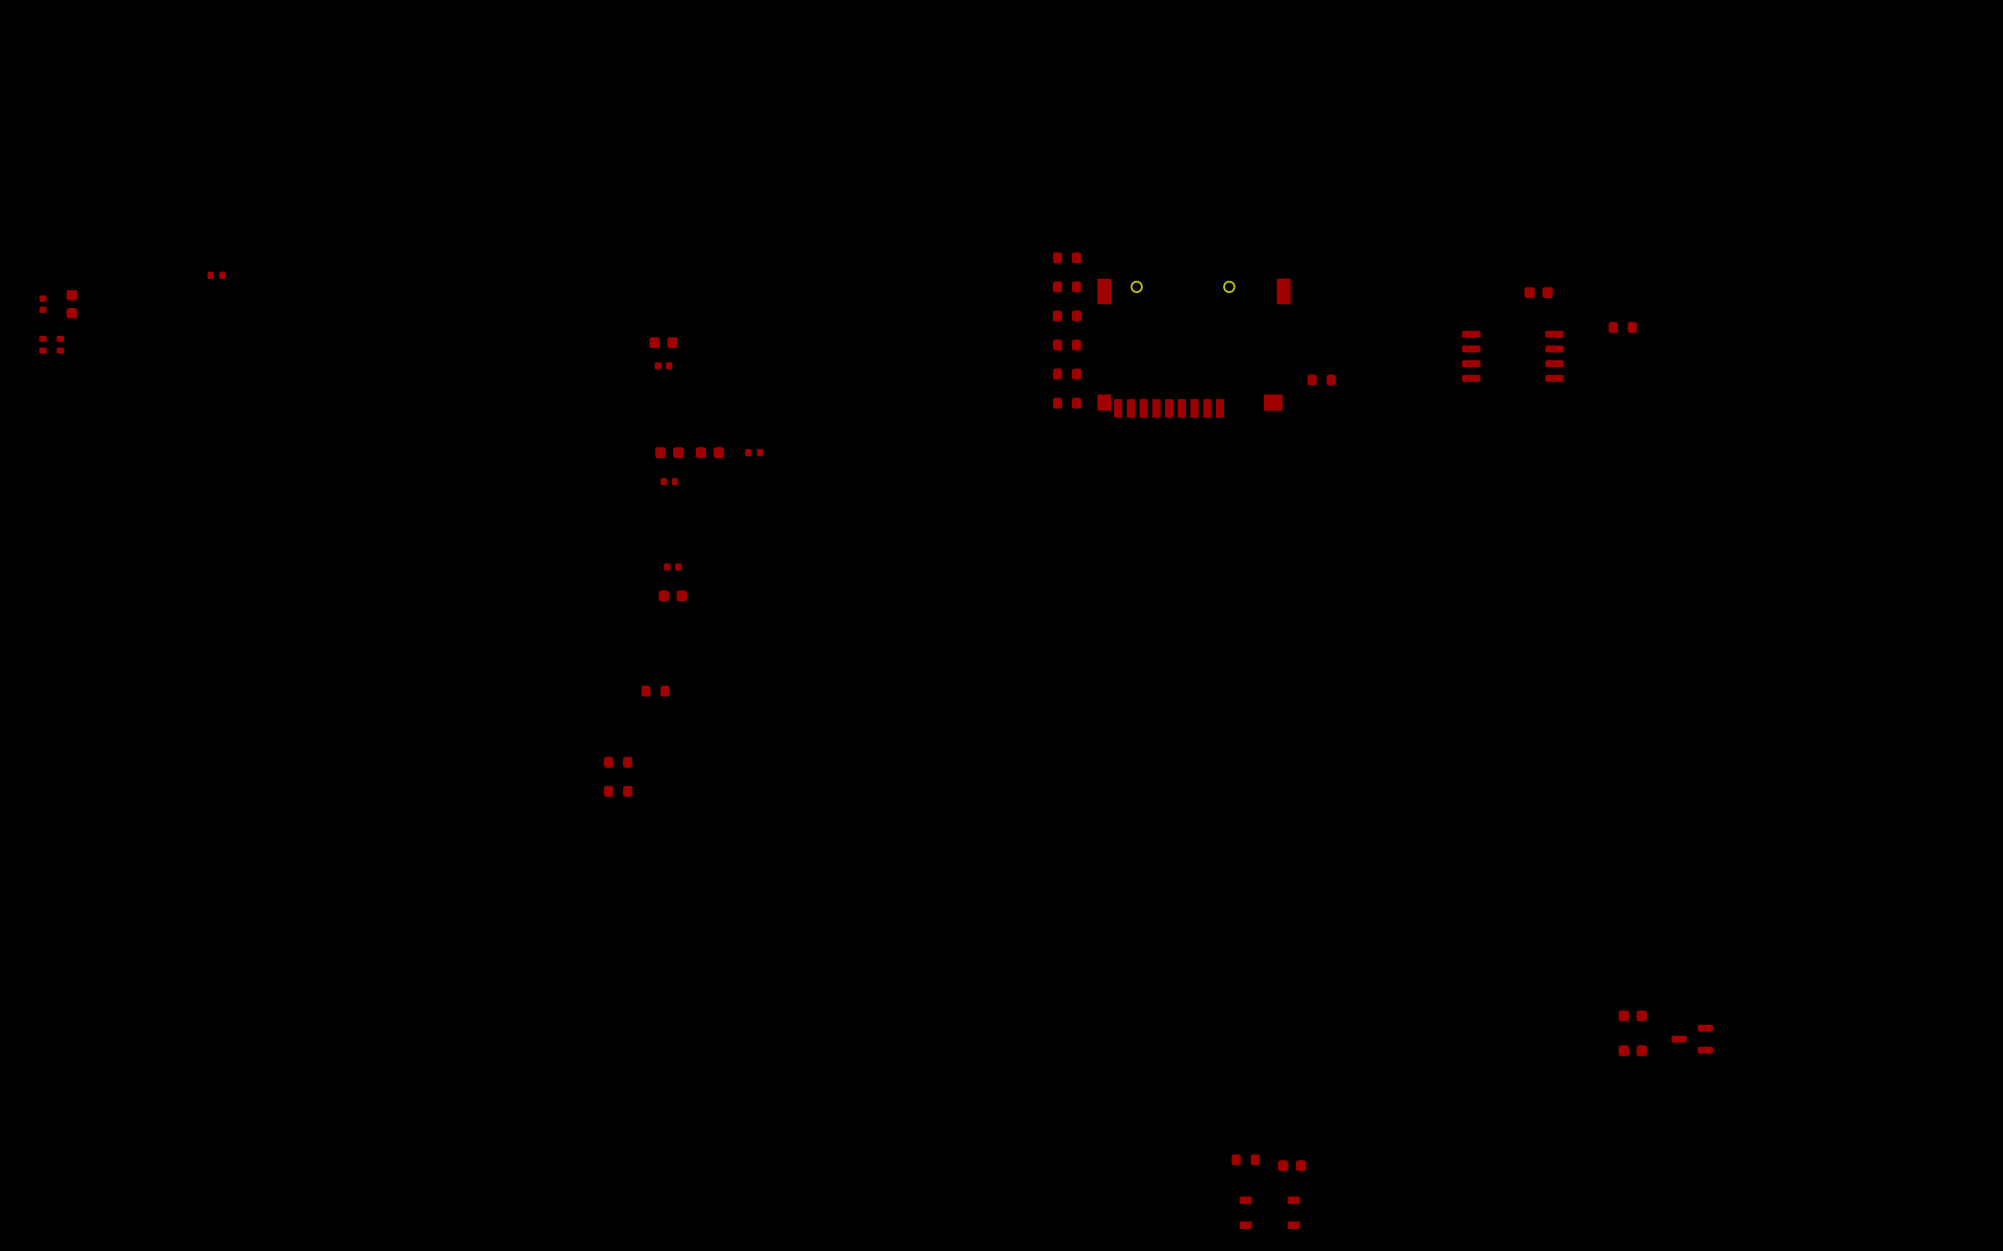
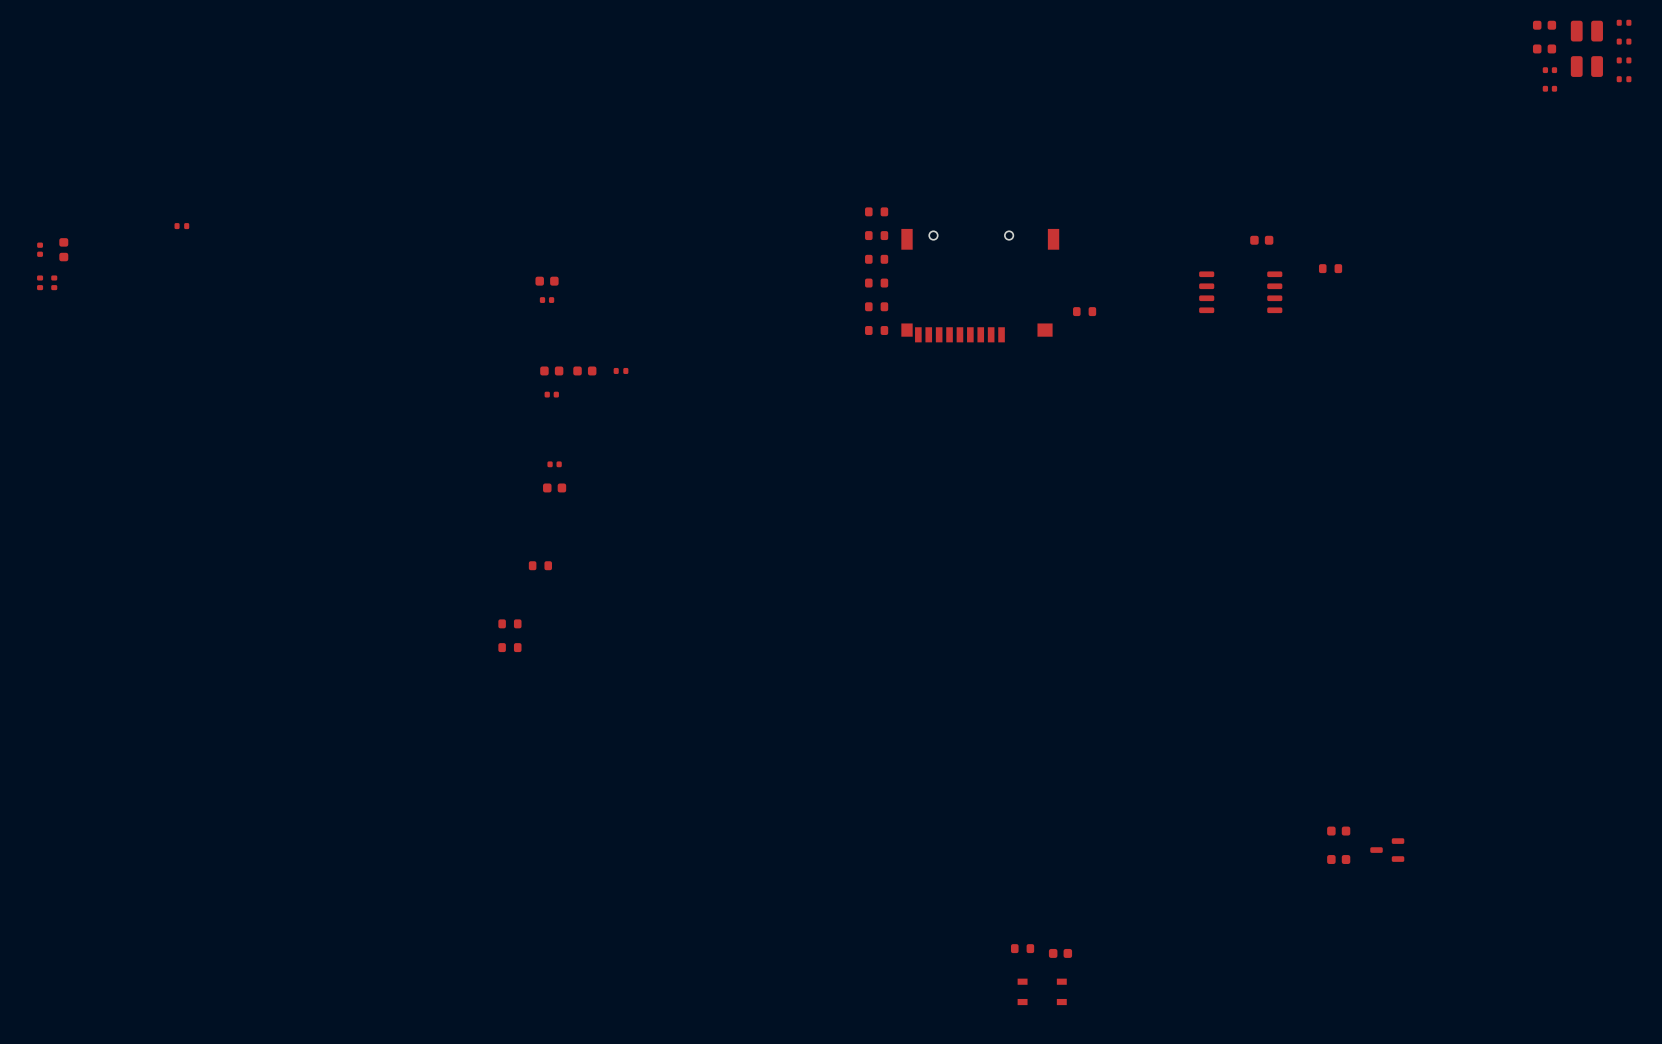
part: none -> (1624, 22)
part: none -> (1544, 25)
part: none -> (1586, 31)
part: none -> (1624, 41)
part: none -> (1544, 48)
part: none -> (1624, 60)
part: none -> (1586, 66)
part: none -> (1549, 70)
part: none -> (1624, 79)
part: none -> (1549, 88)

